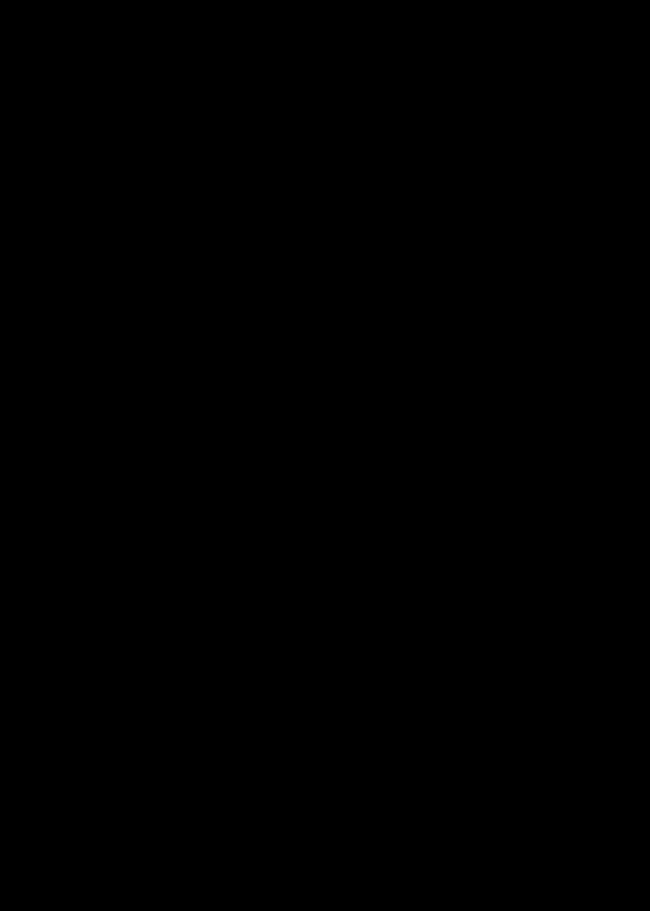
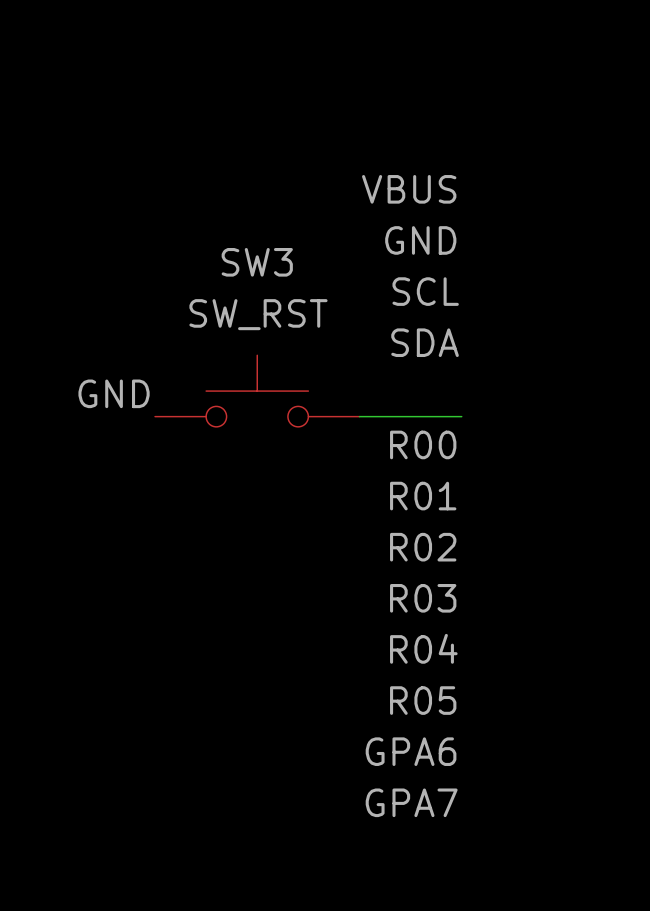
label: none -> VBUS (409, 189)
label: none -> GND (420, 240)
label: none -> SCL (425, 291)
label: none -> SDA (425, 342)
SW3: none -> SW_RST (257, 391)
label: none -> GND (114, 393)
wire: none -> (359, 416) (461, 416)
label: none -> R00 (423, 444)
label: none -> R01 (423, 496)
label: none -> R02 (423, 547)
label: none -> R03 (423, 598)
label: none -> R04 (423, 648)
label: none -> R05 (423, 700)
label: none -> GPA6 (411, 751)
label: none -> GPA7 (411, 802)

